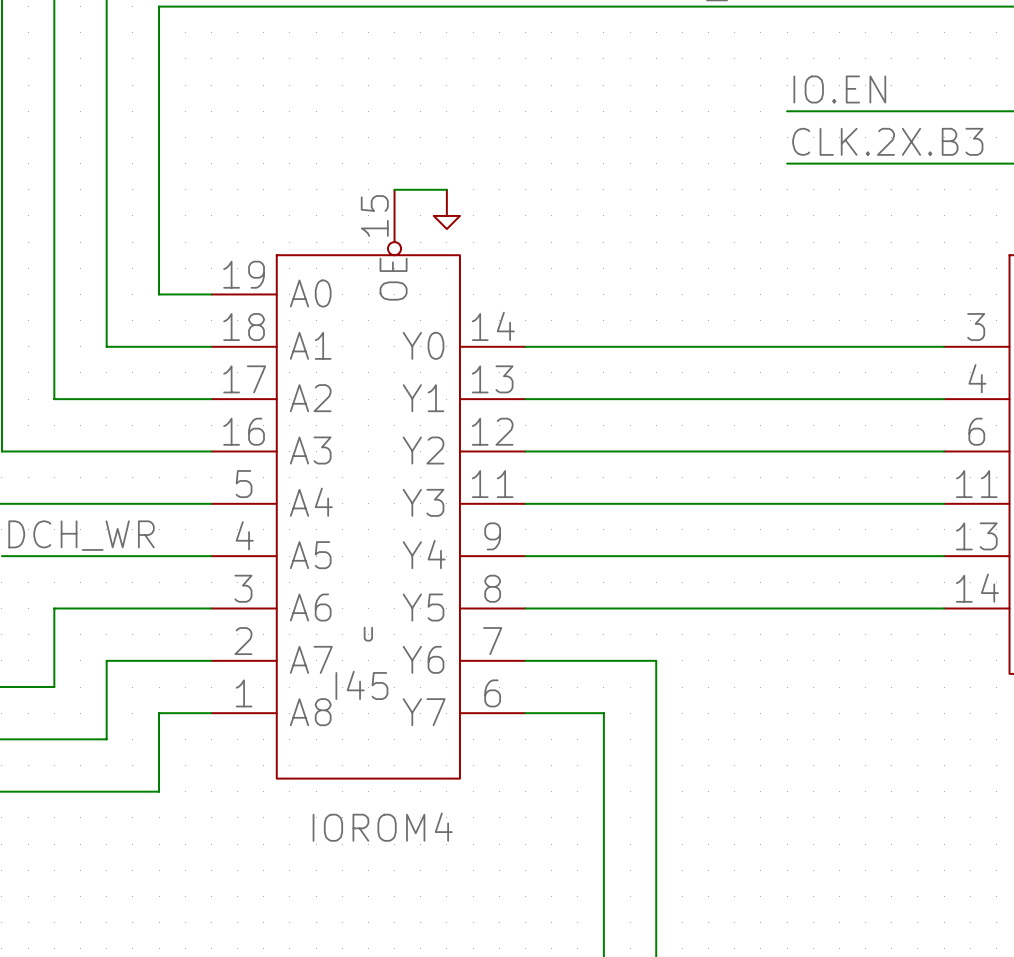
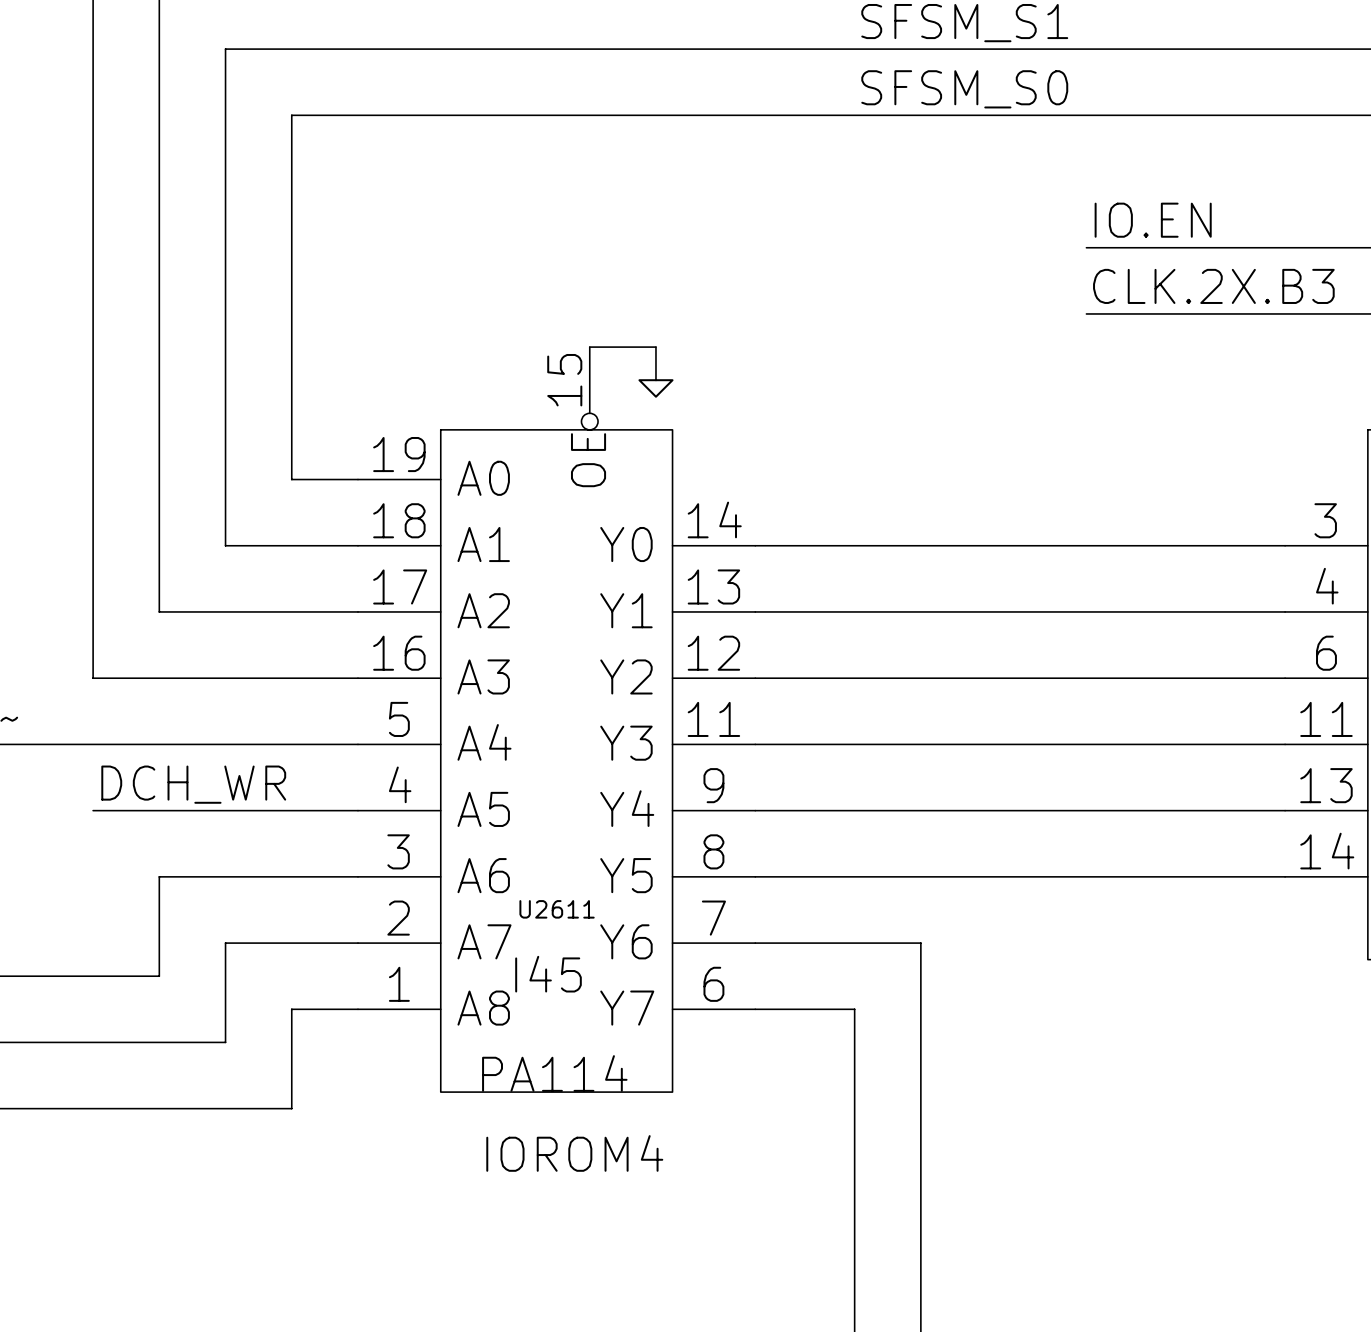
U name: U (368, 634) -> U2611 (557, 909)
U value: none -> PA114 (554, 1073)

